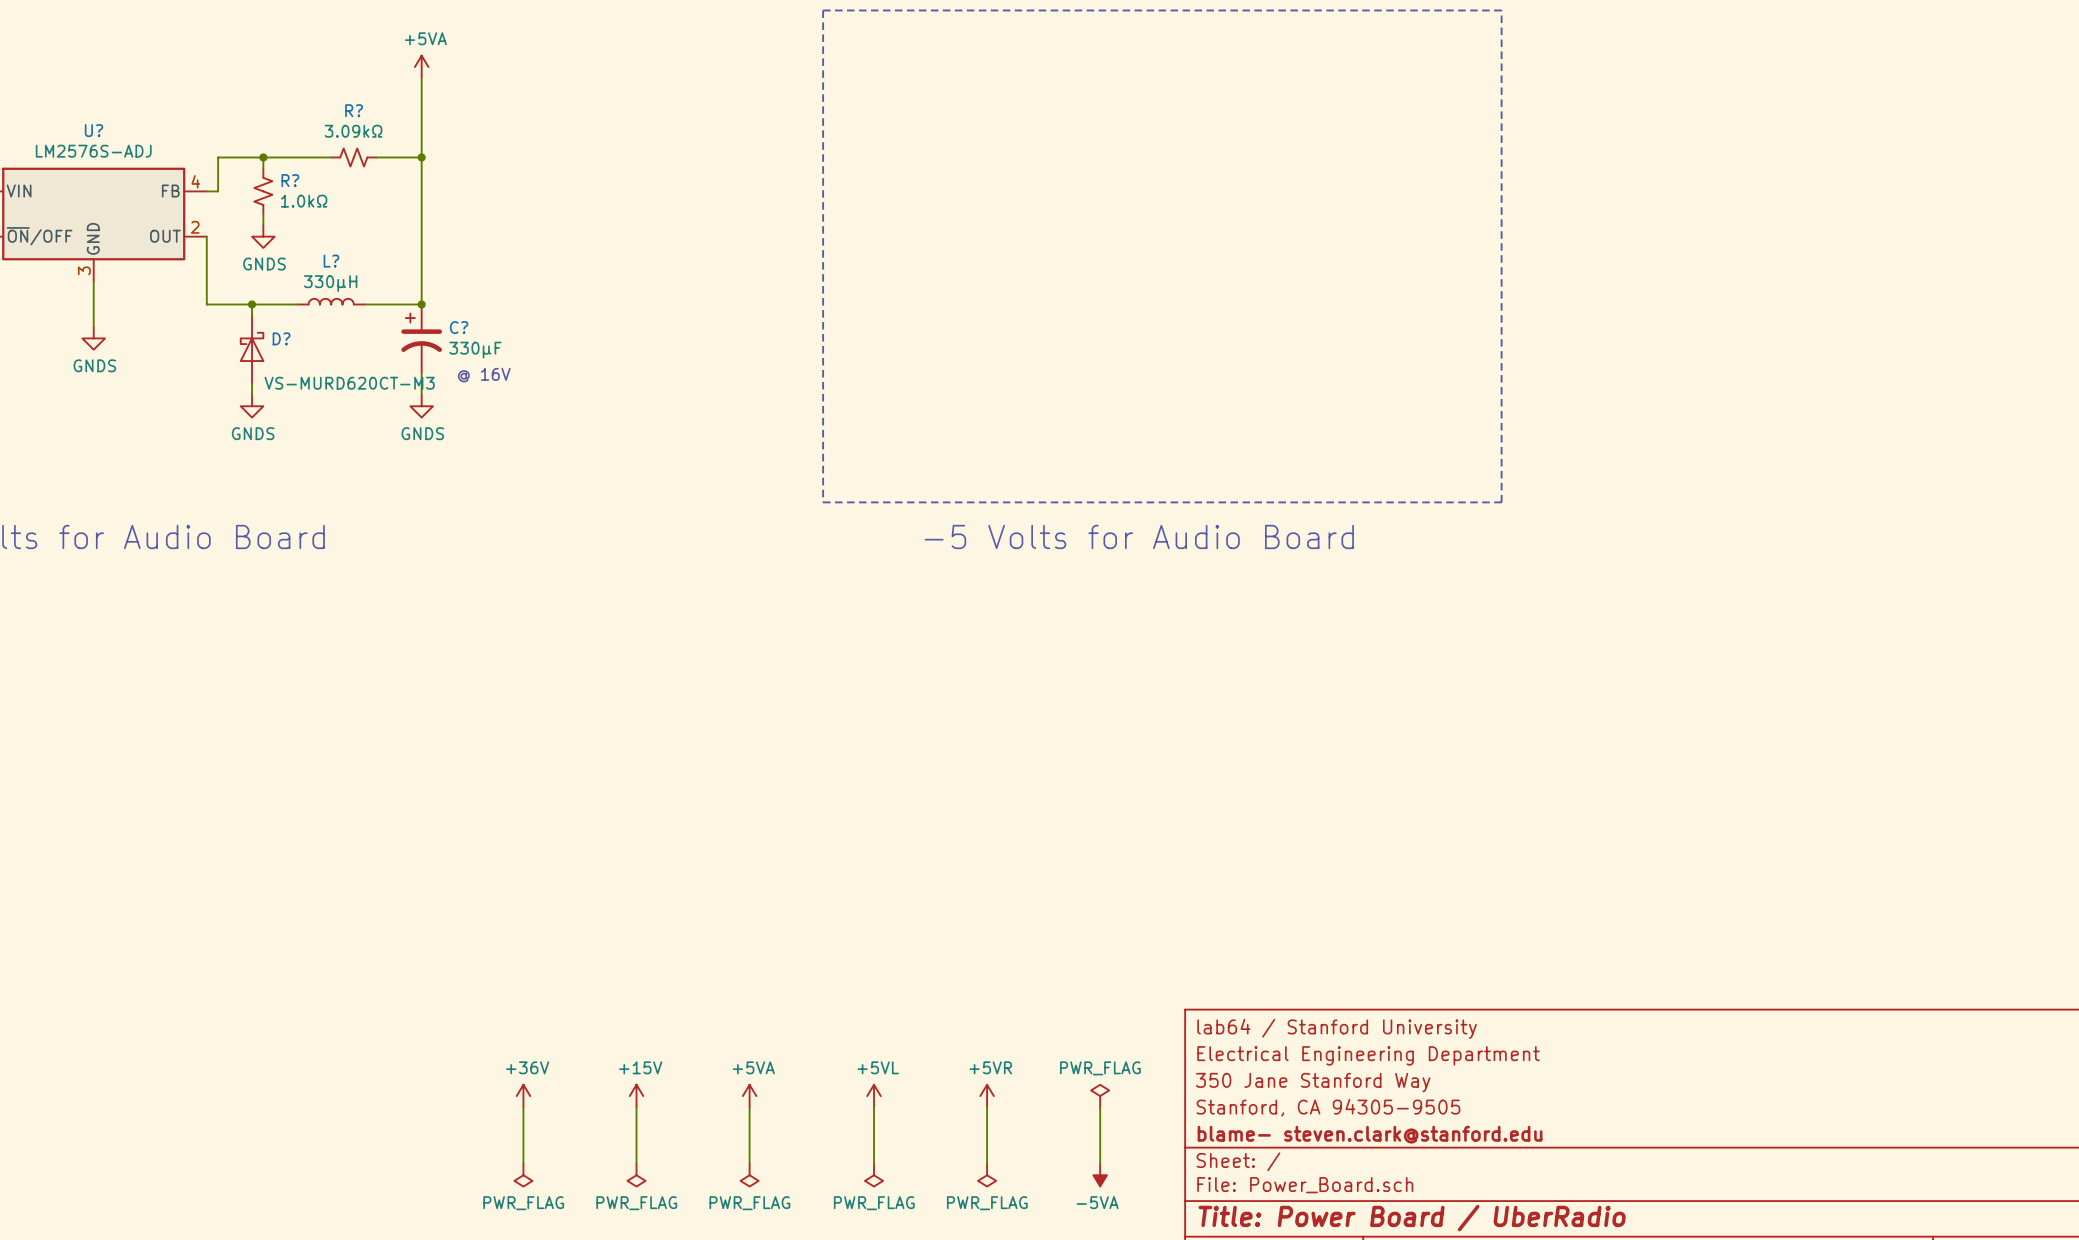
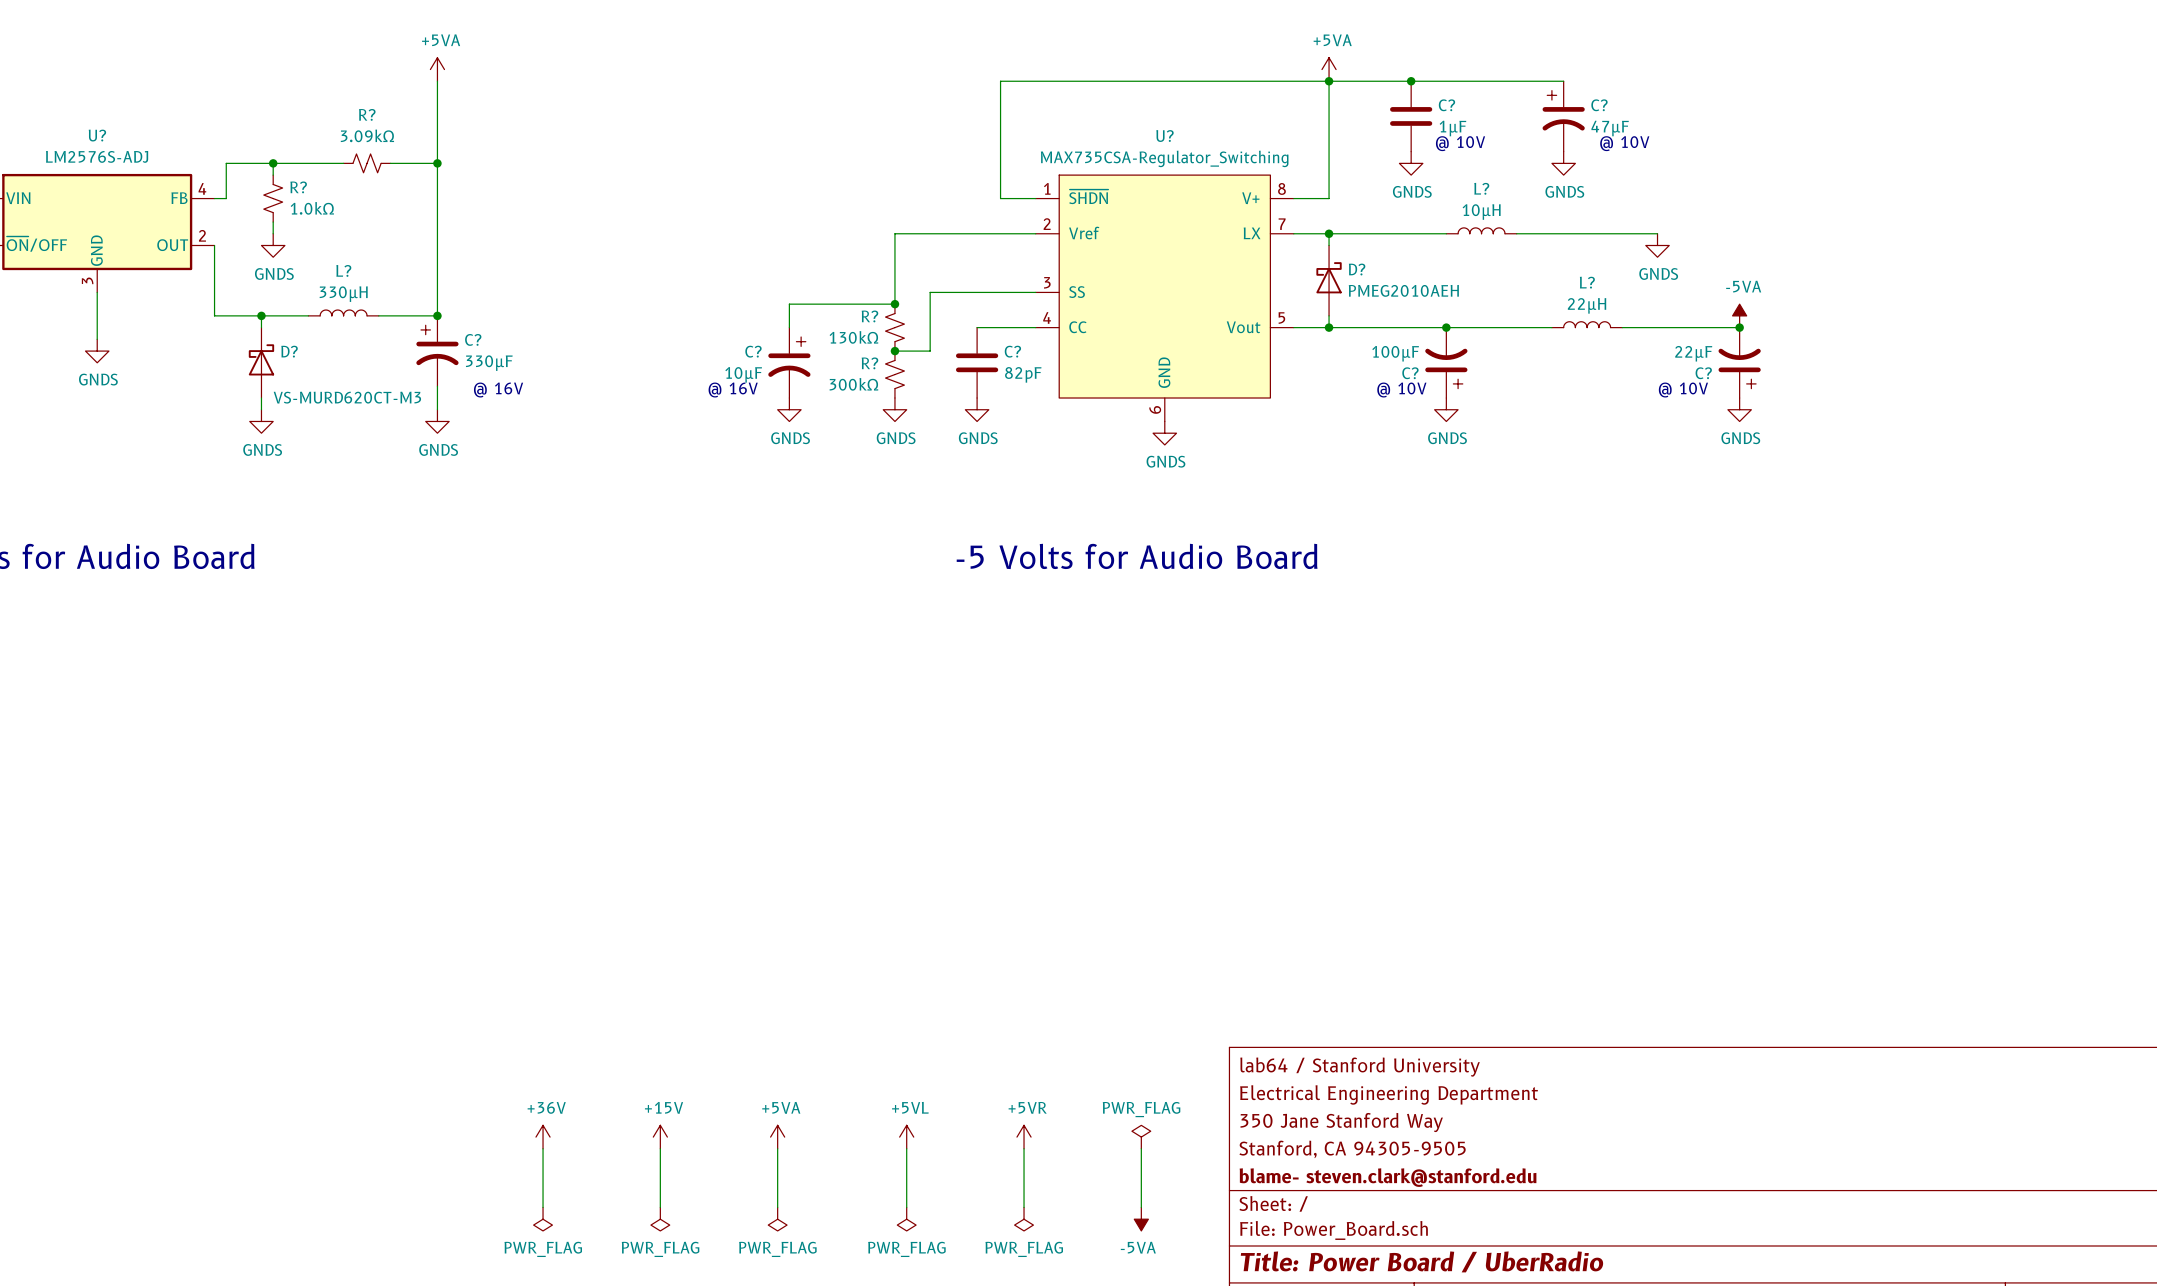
line: (823, 10) (1501, 10) (1501, 502) (823, 502) (823, 10) -> none
power symbol: none -> +5VA (1329, 69)
wire: none -> (1329, 81) (1329, 198) (1293, 198)
junction: none -> (1329, 81)
junction: none -> (1411, 81)
wire: none -> (1563, 81) (1000, 81) (1000, 198) (1035, 198)
C?: none -> 1µF (1411, 116)
C?: none -> 47µF (1563, 116)
text: none -> @ 10V (1460, 143)
text: none -> @ 10V (1624, 143)
power symbol: none -> GNDS (1411, 163)
power symbol: none -> GNDS (1563, 163)
L?: none -> 10µH (1481, 230)
wire: none -> (1035, 233) (894, 233) (894, 304) (789, 304) (789, 327)
wire: none -> (1293, 233) (1446, 233)
wire: none -> (1329, 233) (1329, 245)
junction: none -> (1329, 233)
wire: none -> (1516, 233) (1657, 233)
power symbol: none -> GNDS (1657, 245)
D?: none -> PMEG2010AEH (1329, 280)
wire: none -> (1035, 292) (930, 292) (930, 351) (894, 351)
U?: none -> MAX735CSA-Regulator_Switching (1164, 298)
junction: none -> (894, 304)
wire: none -> (1329, 315) (1329, 327)
power symbol: none -> -5VA (1739, 315)
L?: none -> 22µH (1587, 324)
R?: none -> 130kΩ (894, 327)
wire: none -> (977, 327) (1035, 327)
wire: none -> (1293, 327) (1551, 327)
junction: none -> (1329, 327)
junction: none -> (1446, 327)
wire: none -> (1622, 327) (1739, 327)
junction: none -> (1739, 327)
junction: none -> (894, 351)
C?: none -> 10µF (789, 362)
C?: none -> 82pF (977, 362)
C?: none -> 100µF (1446, 362)
C?: none -> 22µF (1739, 362)
R?: none -> 300kΩ (894, 374)
text: none -> @ 16V (733, 390)
text: none -> @ 10V (1401, 390)
text: none -> @ 10V (1683, 390)
power symbol: none -> GNDS (789, 409)
power symbol: none -> GNDS (894, 409)
power symbol: none -> GNDS (977, 409)
power symbol: none -> GNDS (1446, 409)
power symbol: none -> GNDS (1739, 409)
power symbol: none -> GNDS (1164, 433)

